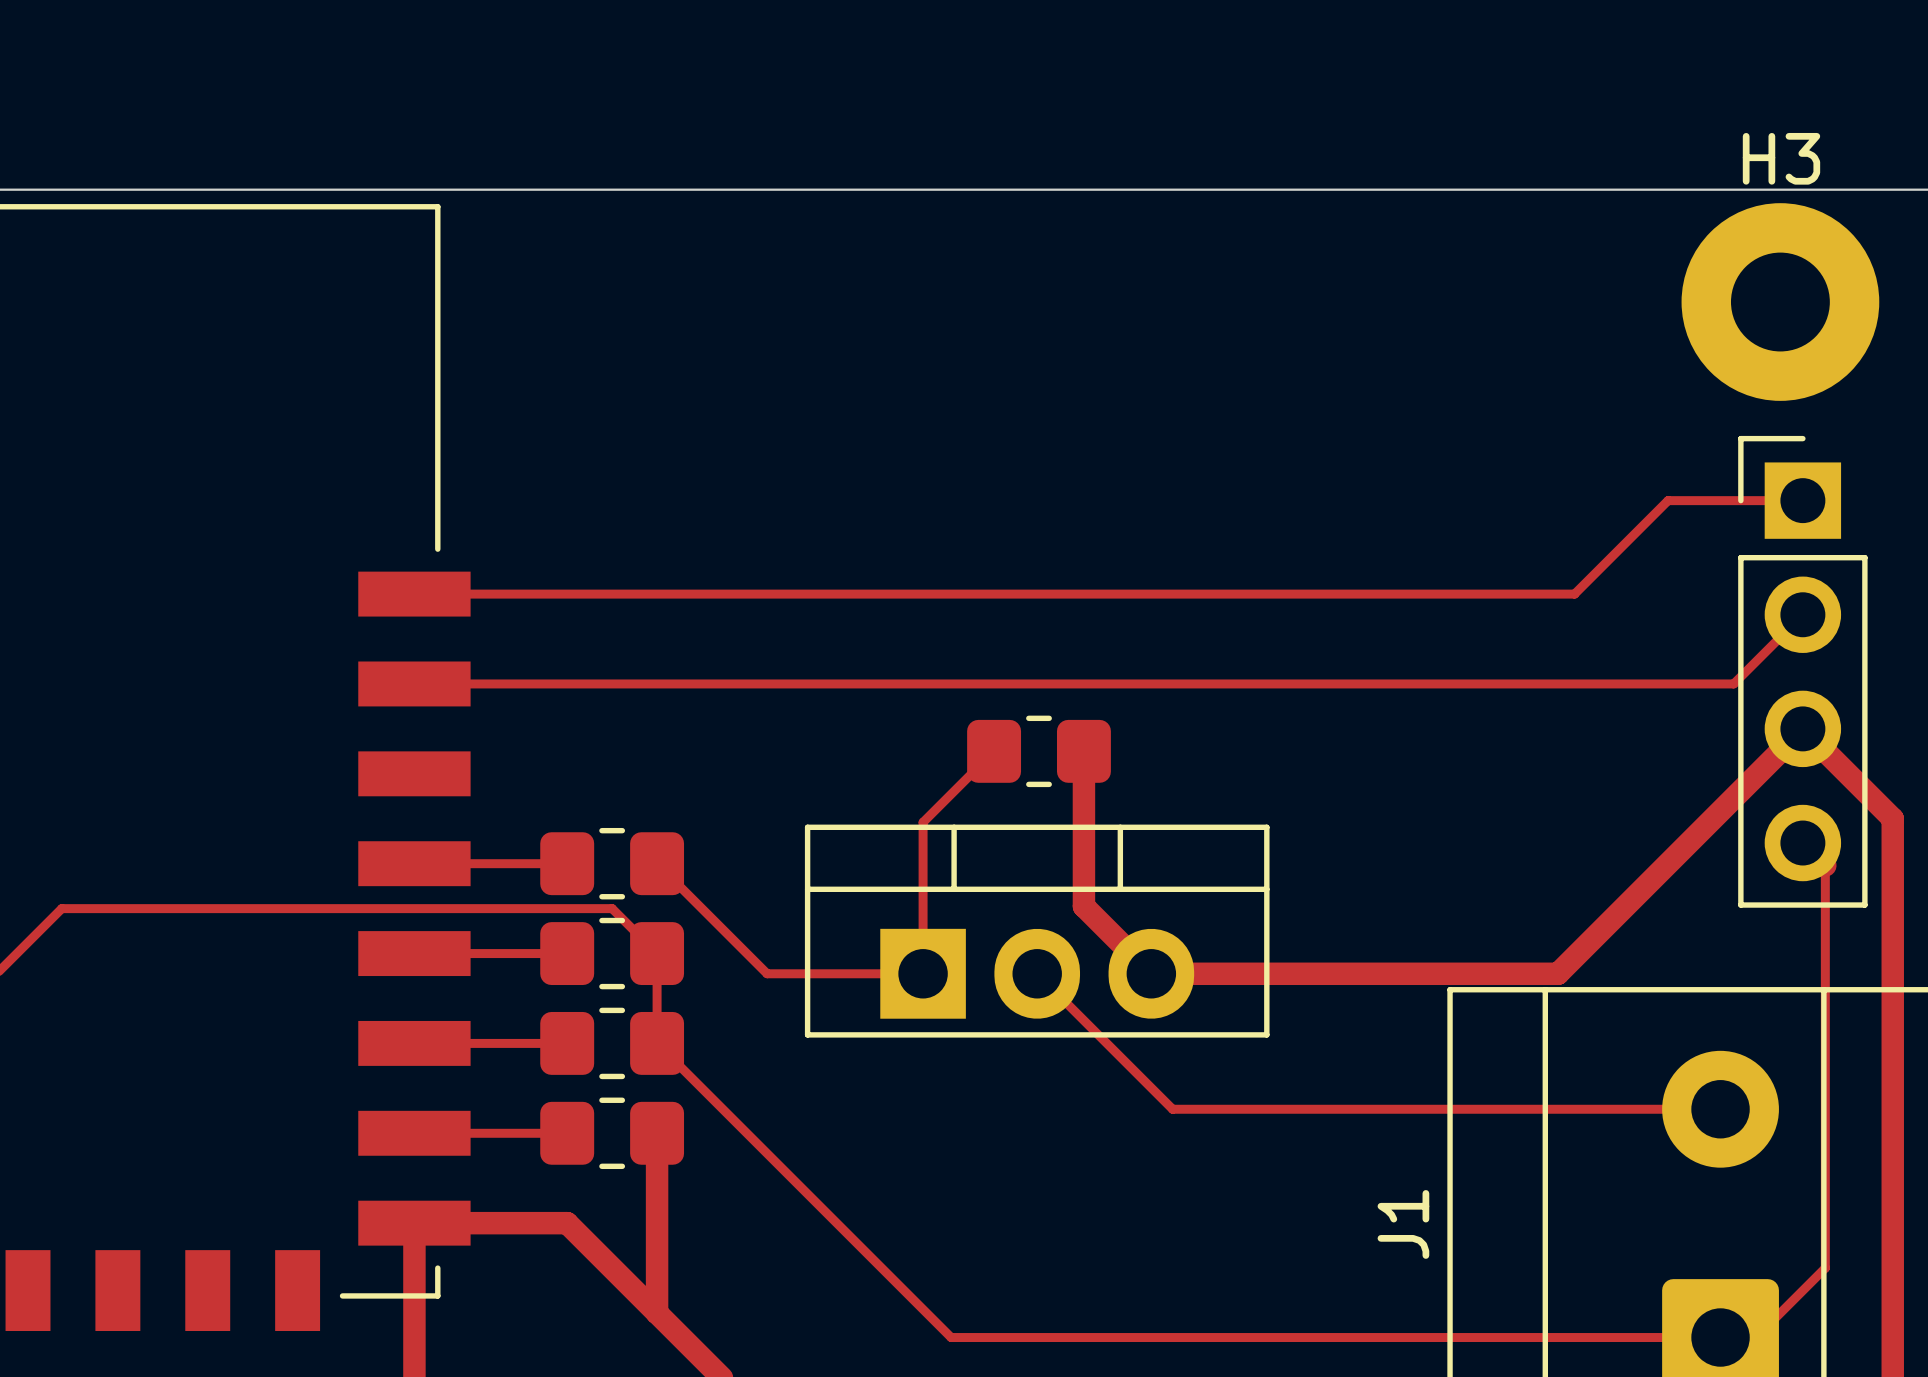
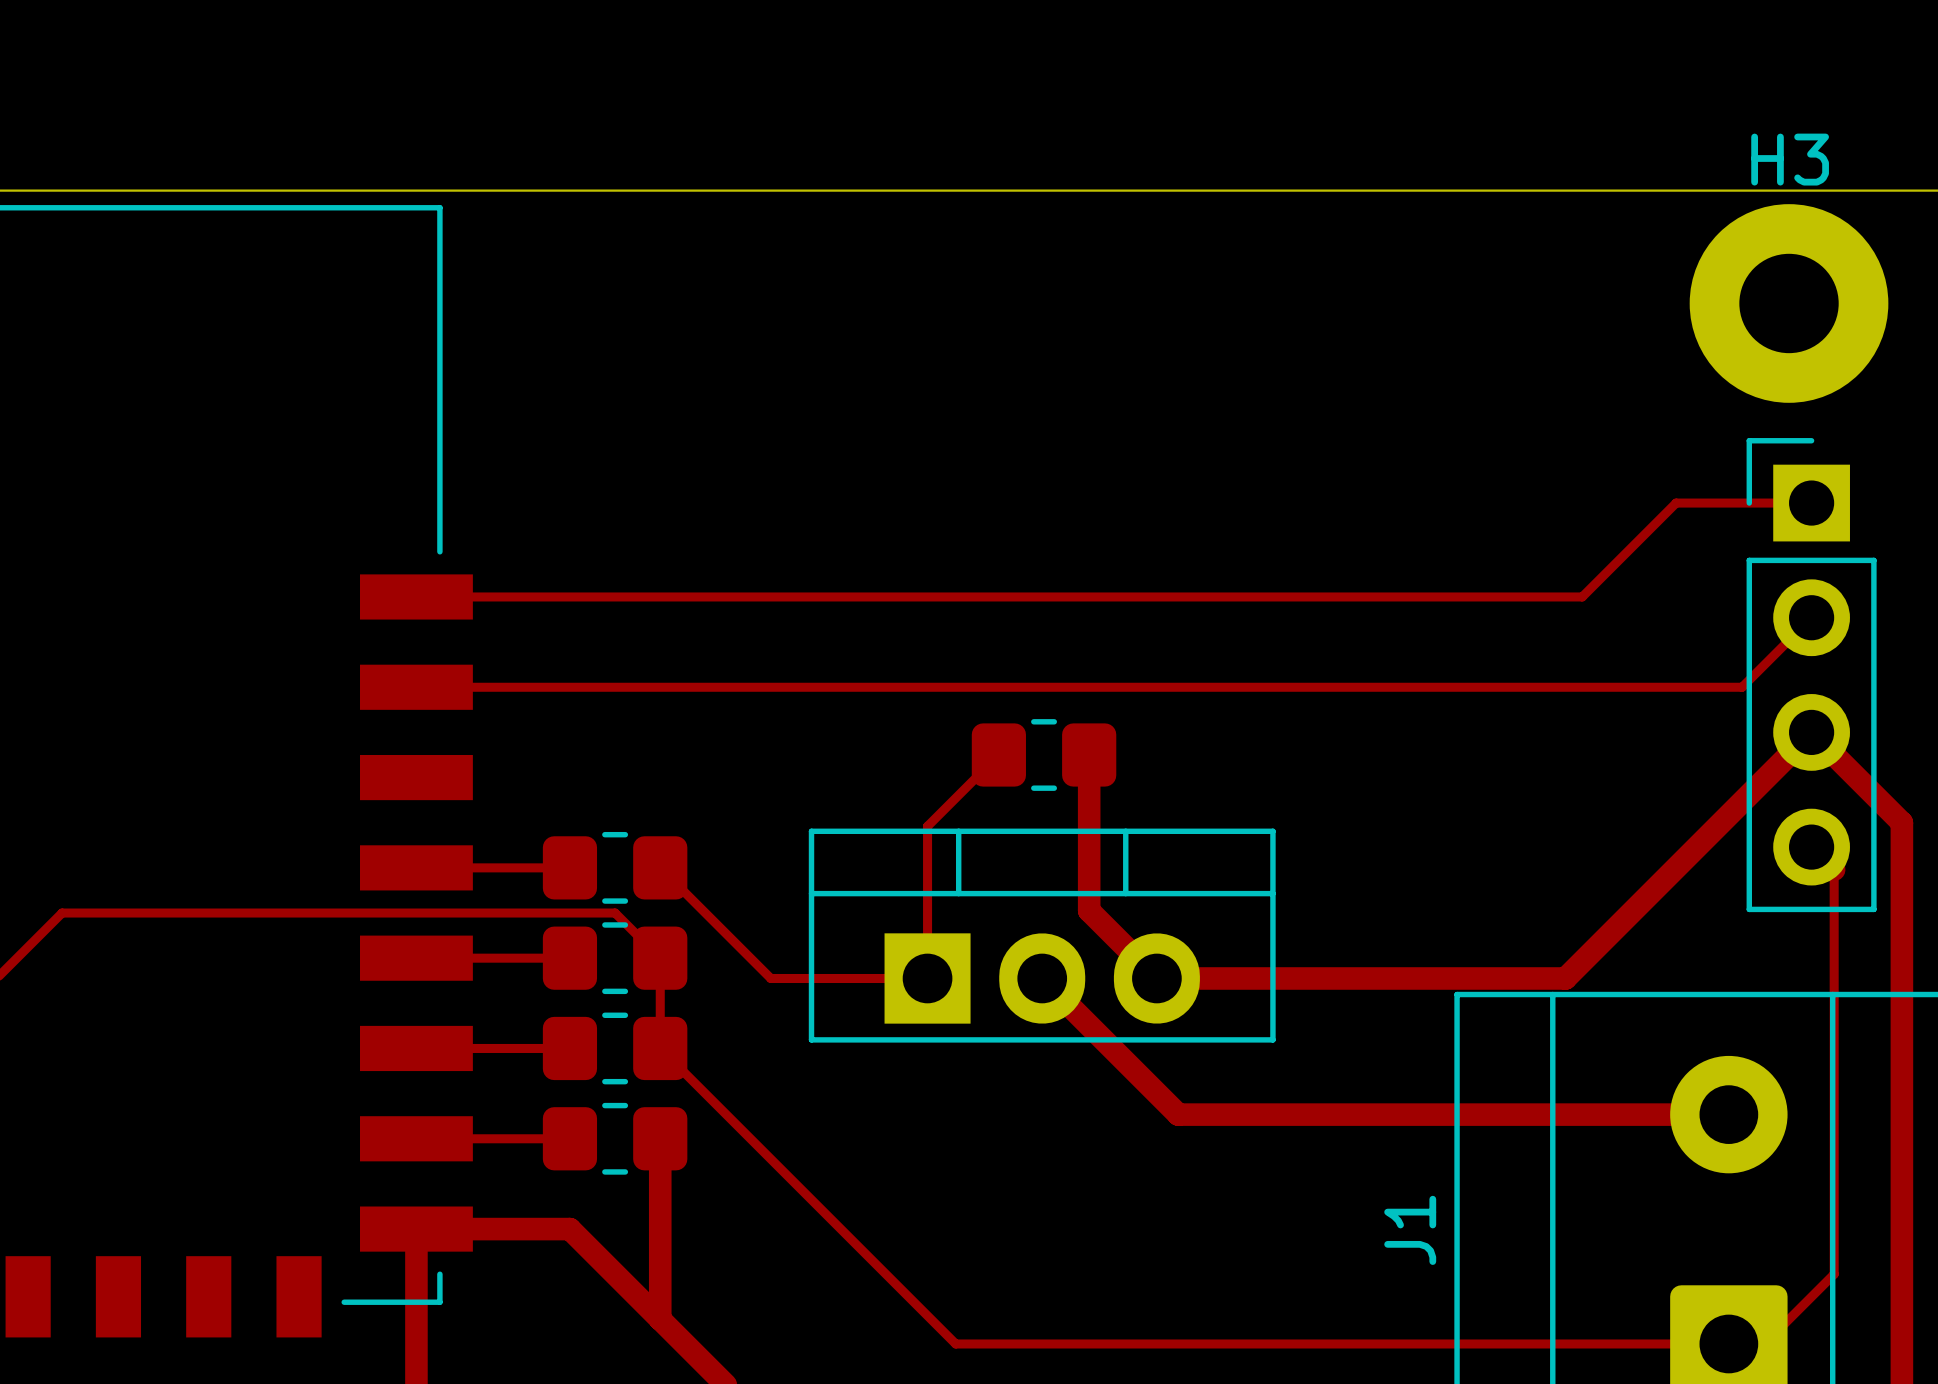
top track width: thin (1037, 973) (1172, 1109) (1720, 1109) -> thick (1042, 978) (1178, 1114) (1728, 1114)

